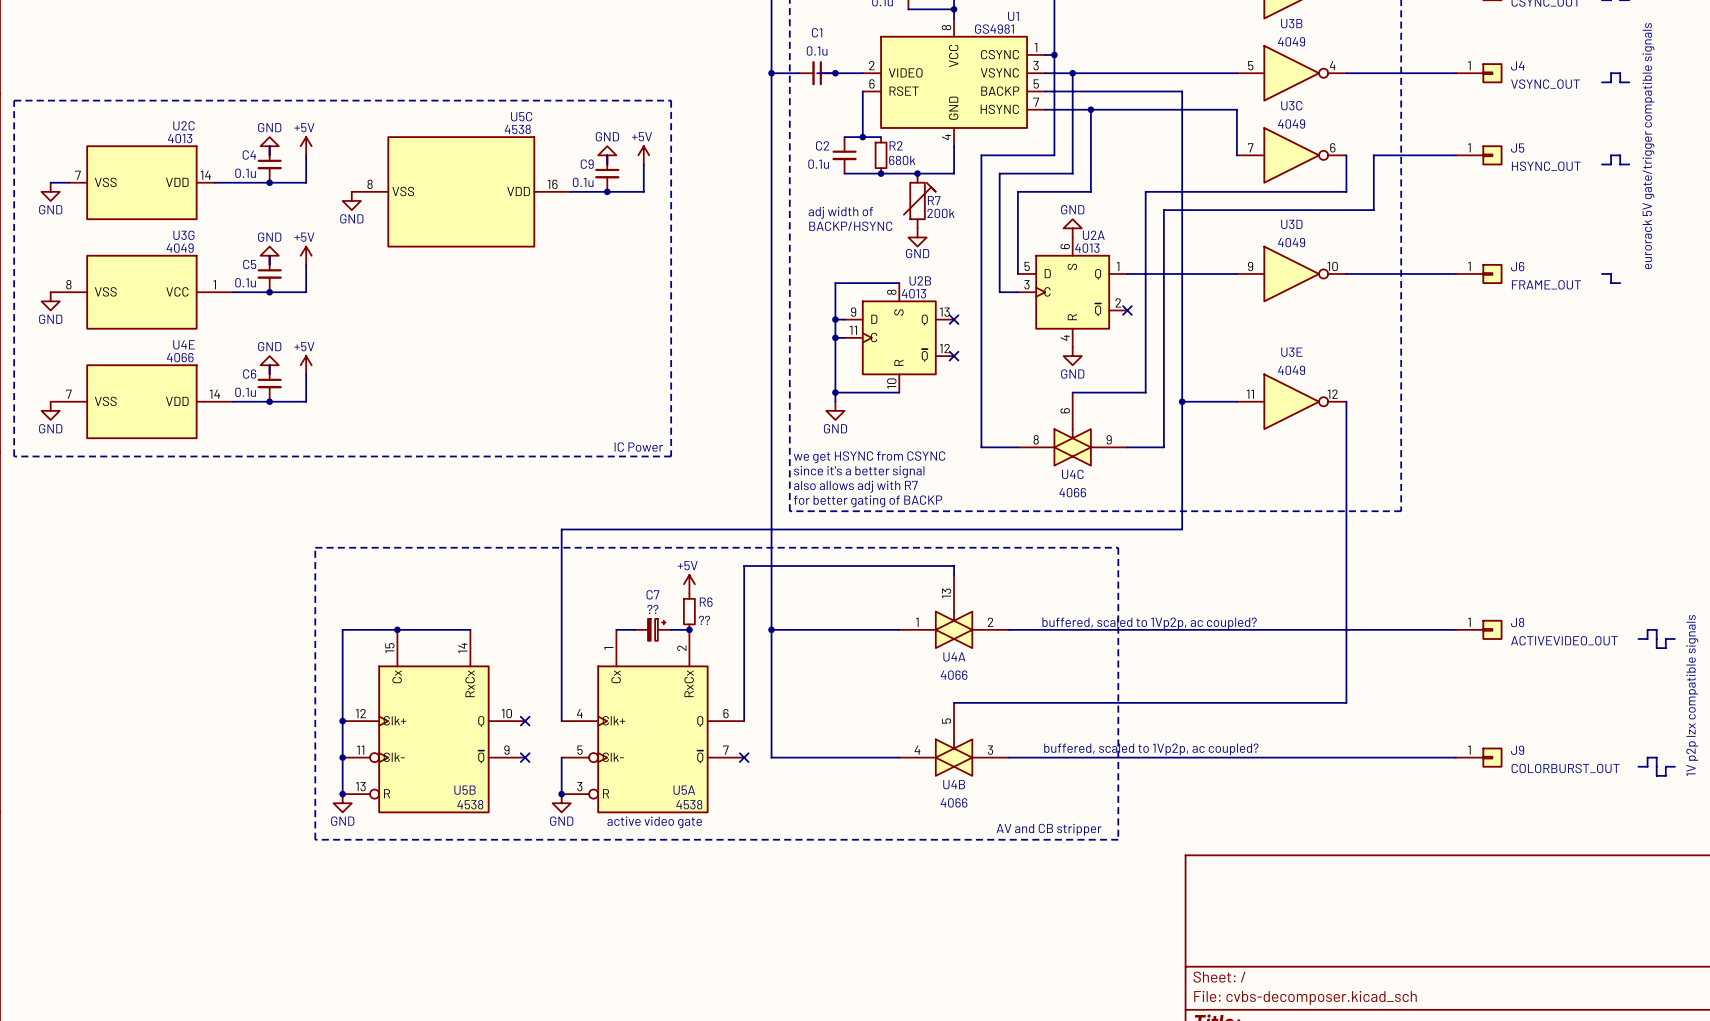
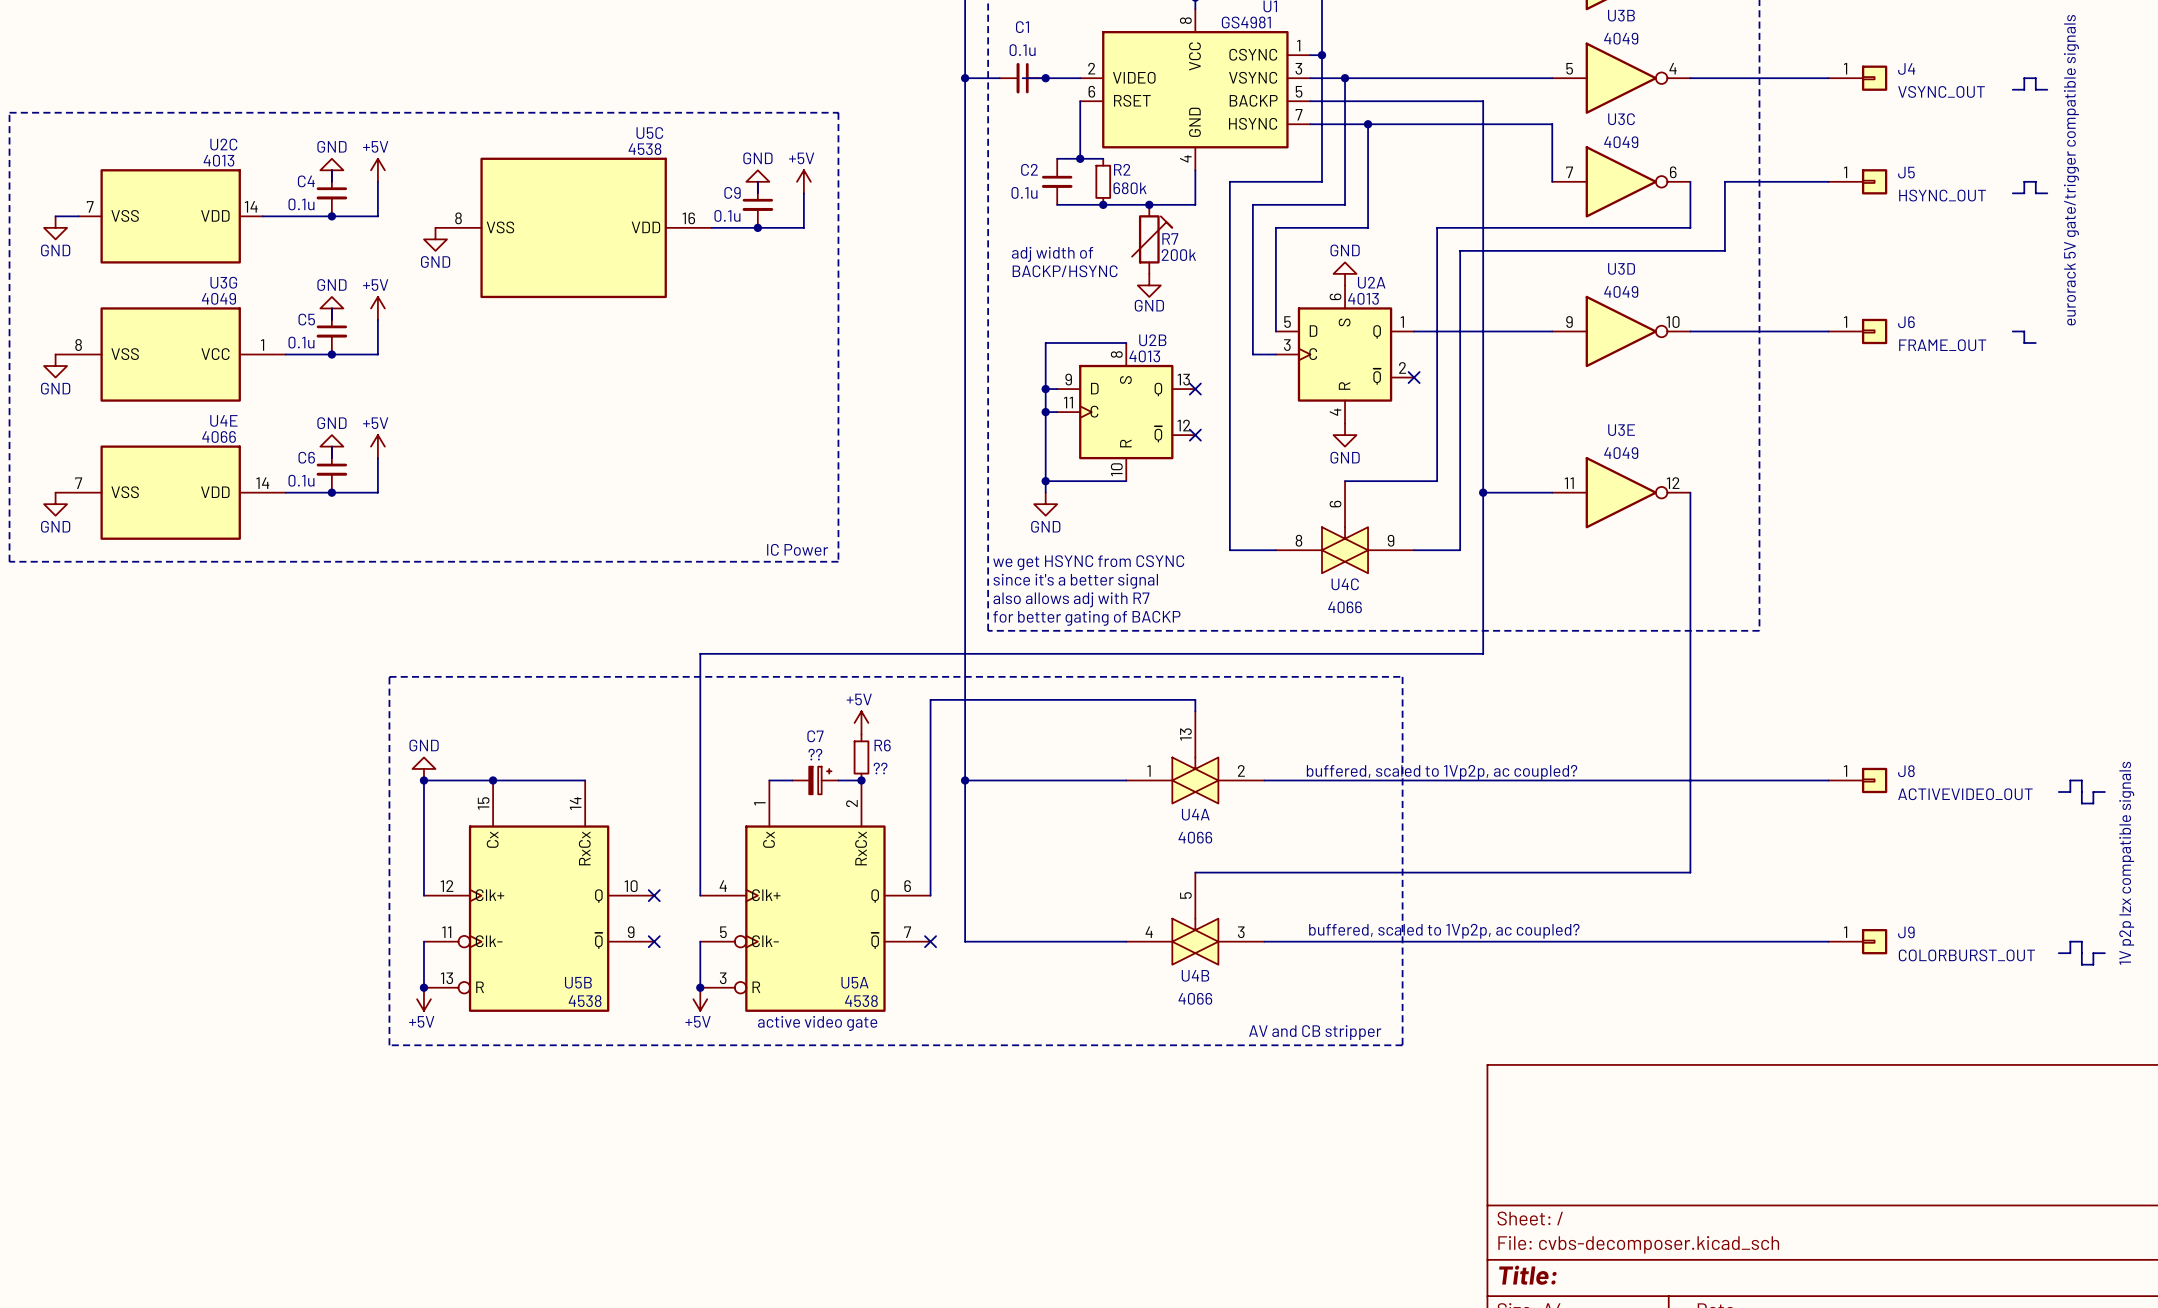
power symbol: none -> GND (423, 768)
junction: none -> (423, 780)
wire: (342, 721) (342, 757) -> none
junction: (342, 721) -> none
junction: (342, 757) -> none
power symbol: GND (342, 803) -> +5V (423, 999)
power symbol: GND (561, 803) -> +5V (700, 999)

